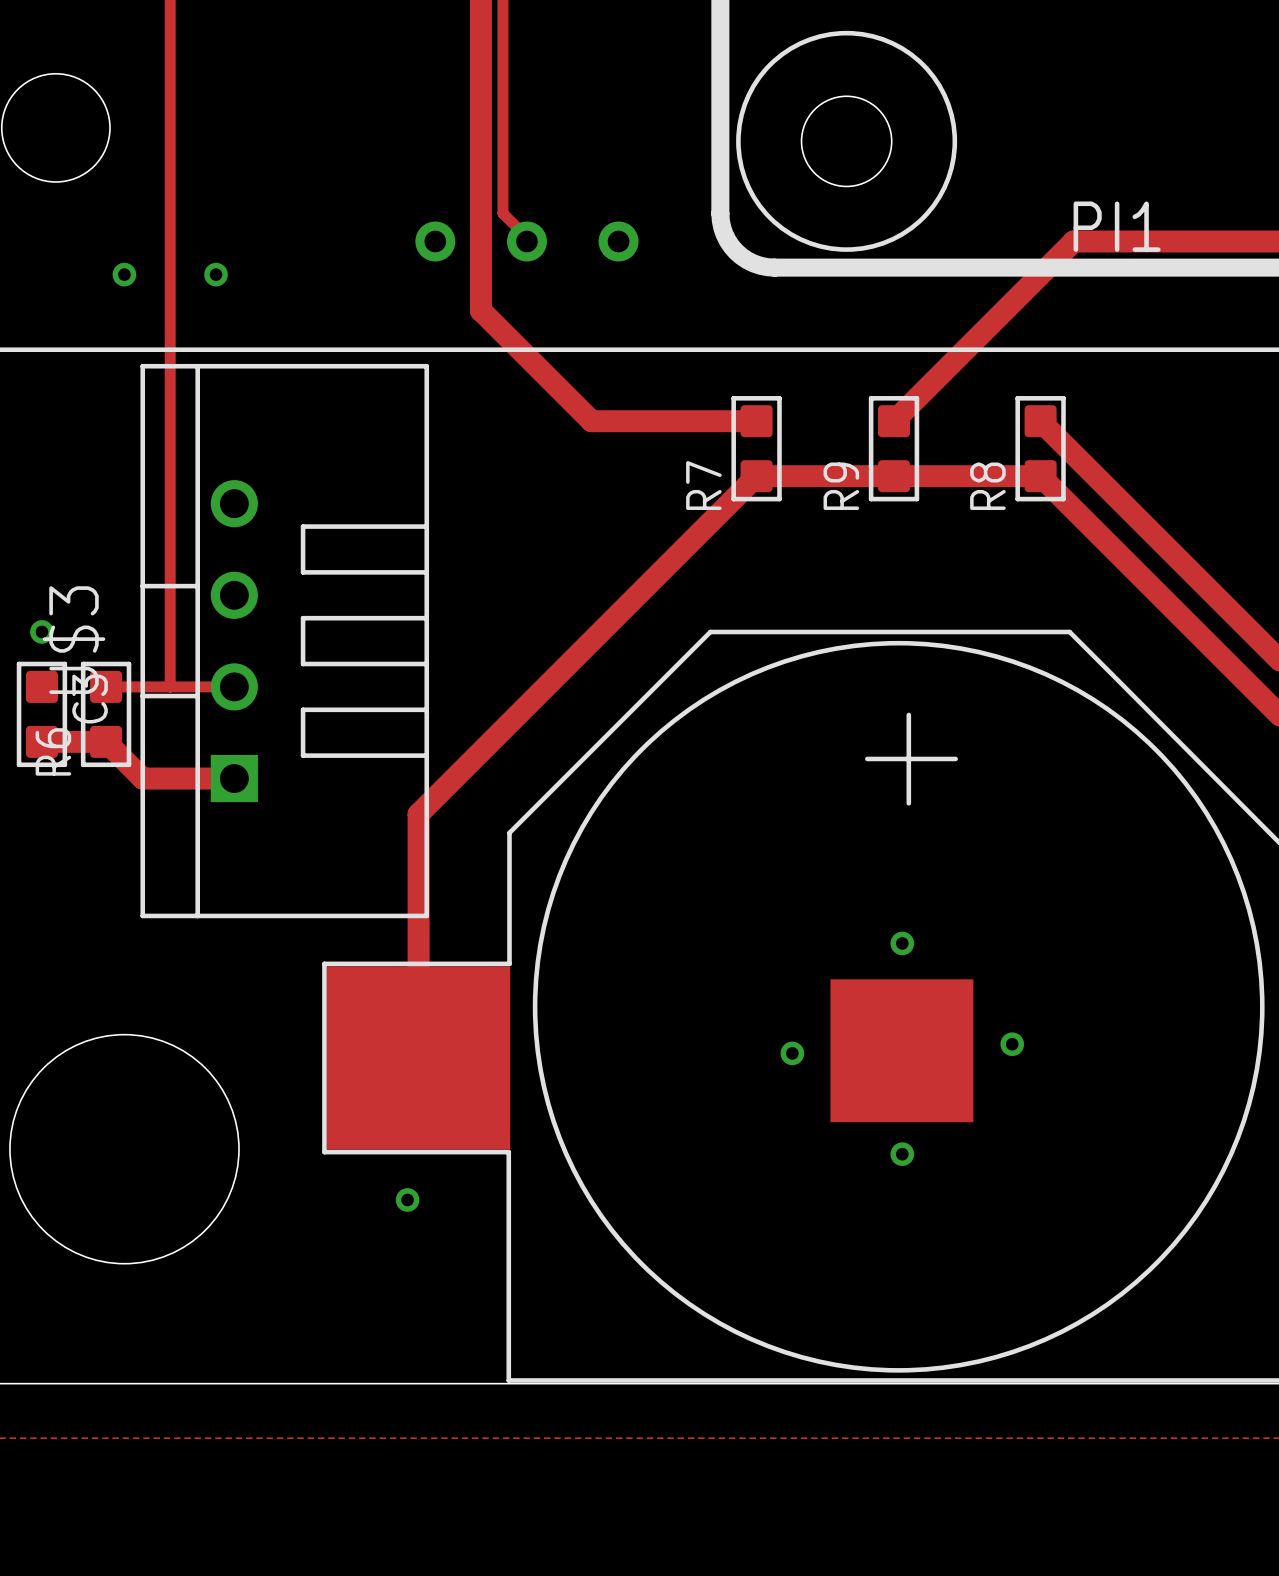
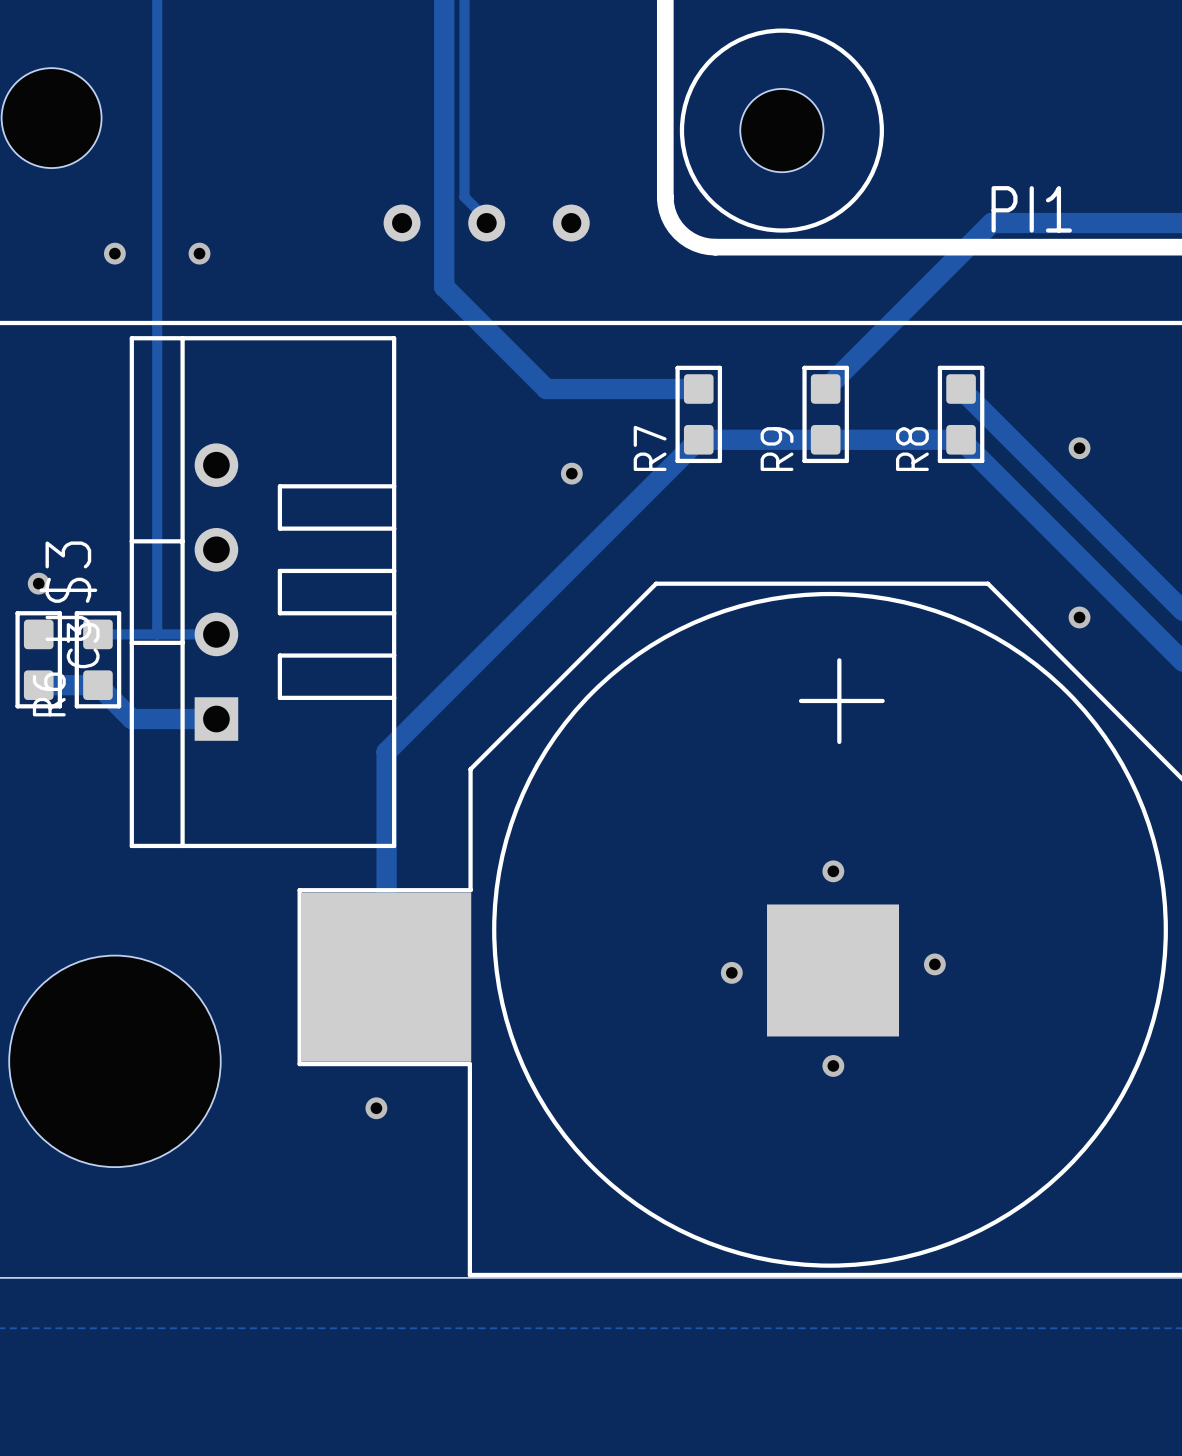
via: none -> (1079, 448)
via: none -> (571, 473)
via: none -> (1079, 617)

